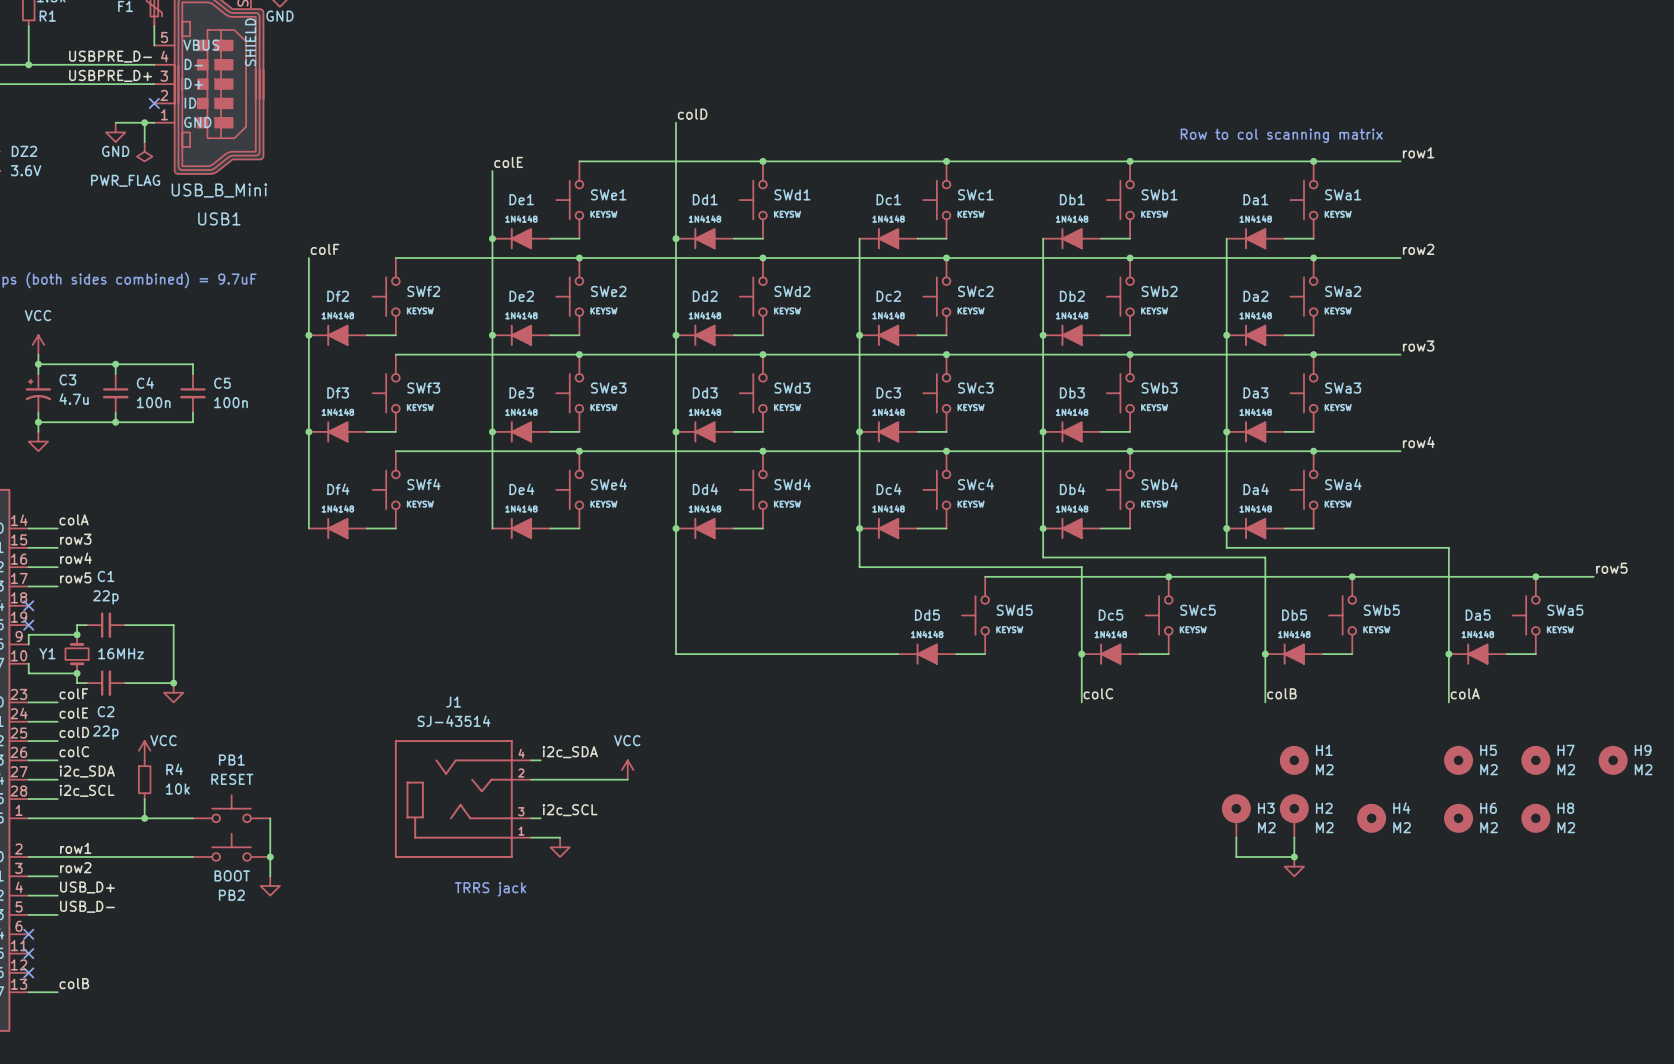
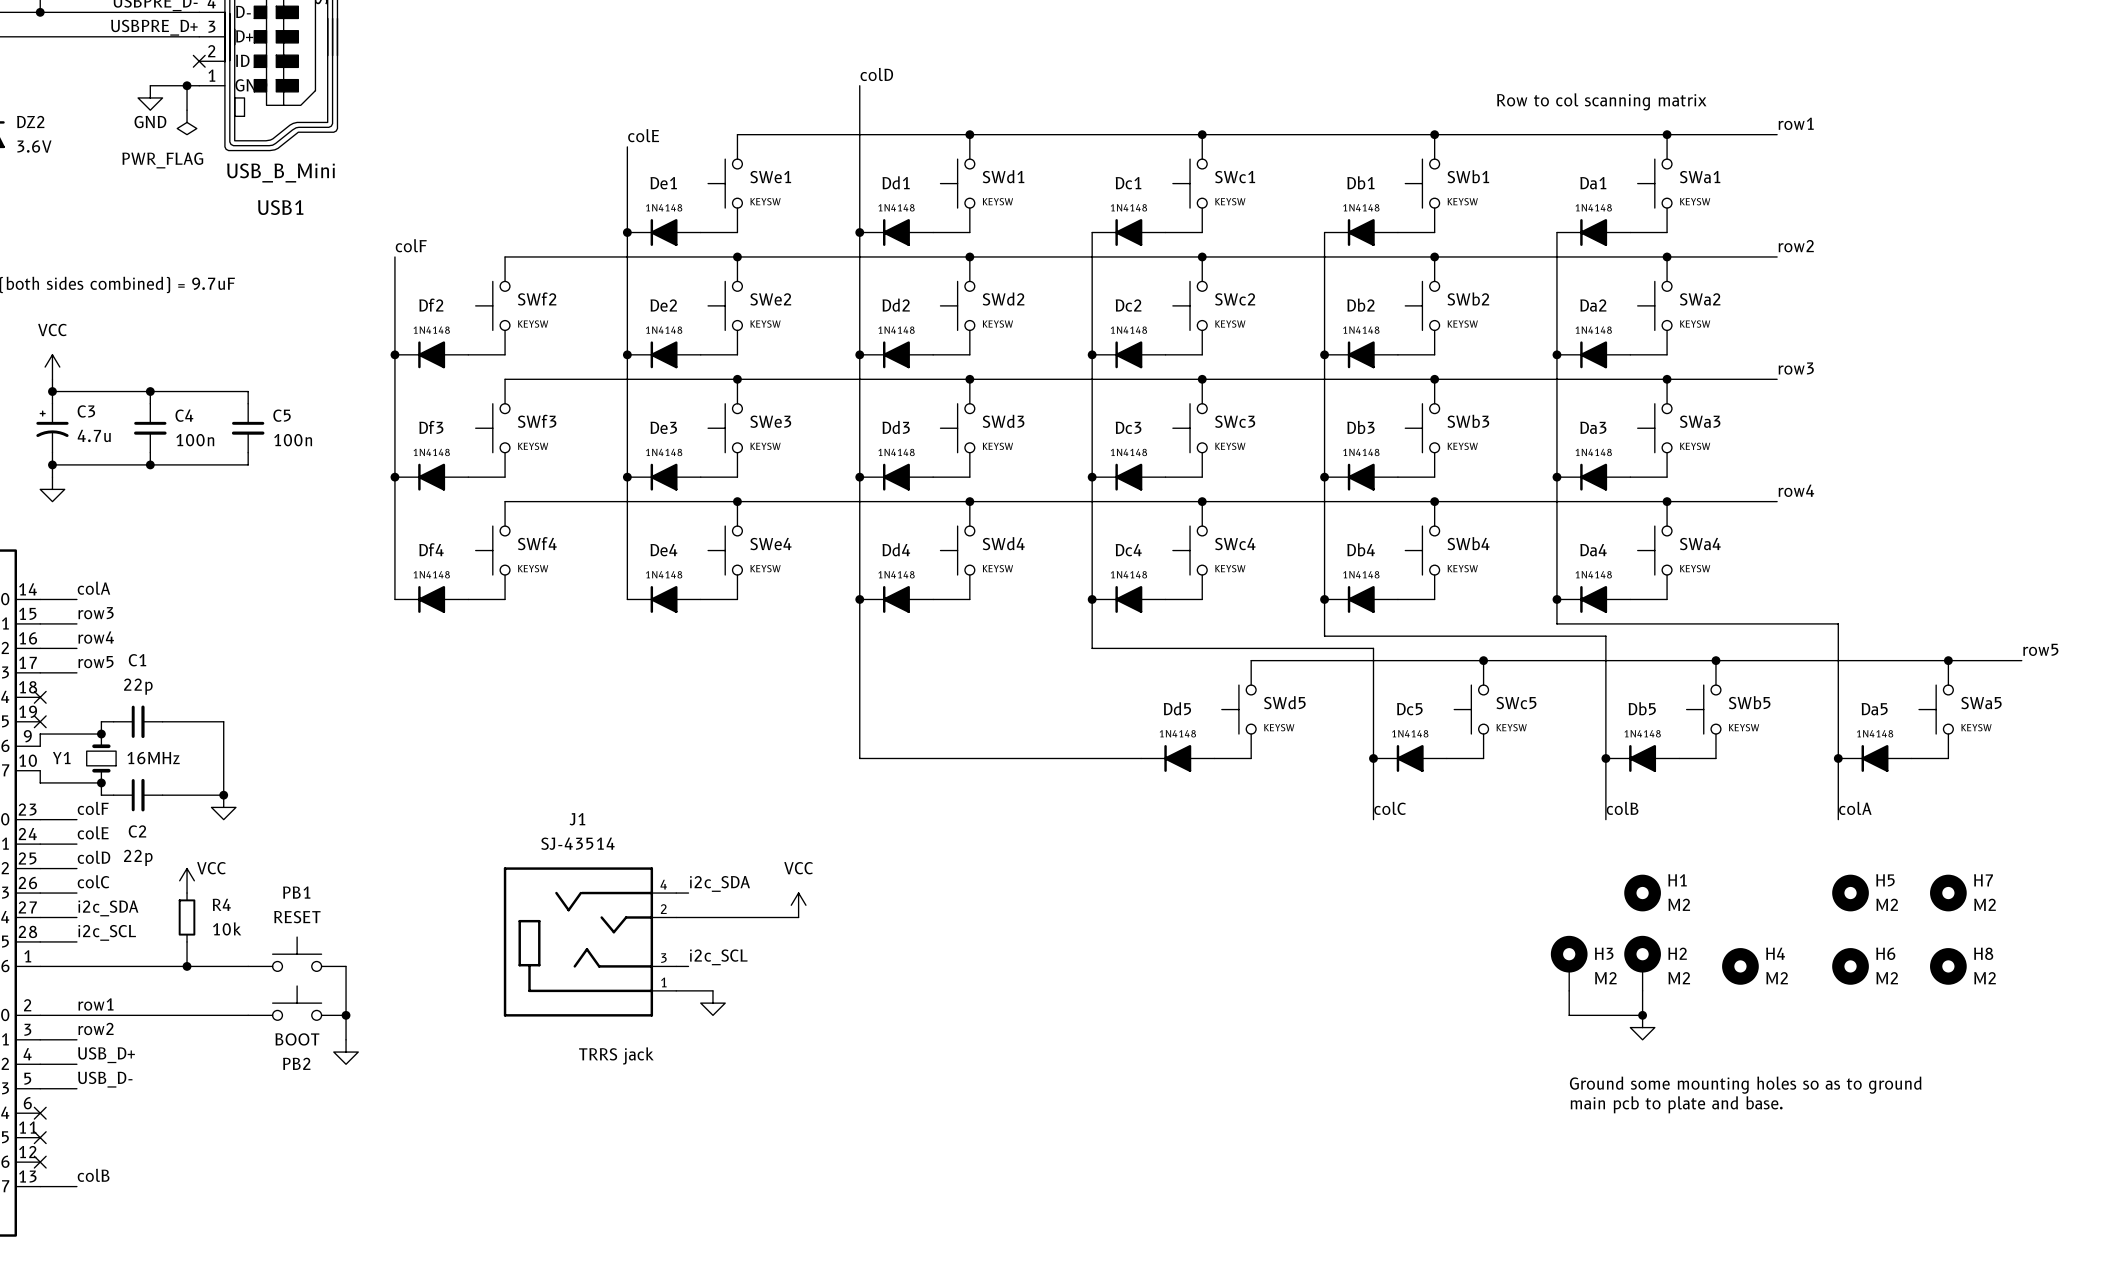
H9: M2 (1613, 760) -> none
text: none -> Ground some mounting holes so as to ground (1745, 1085)
text: none -> main pcb to plate and base. (1676, 1104)

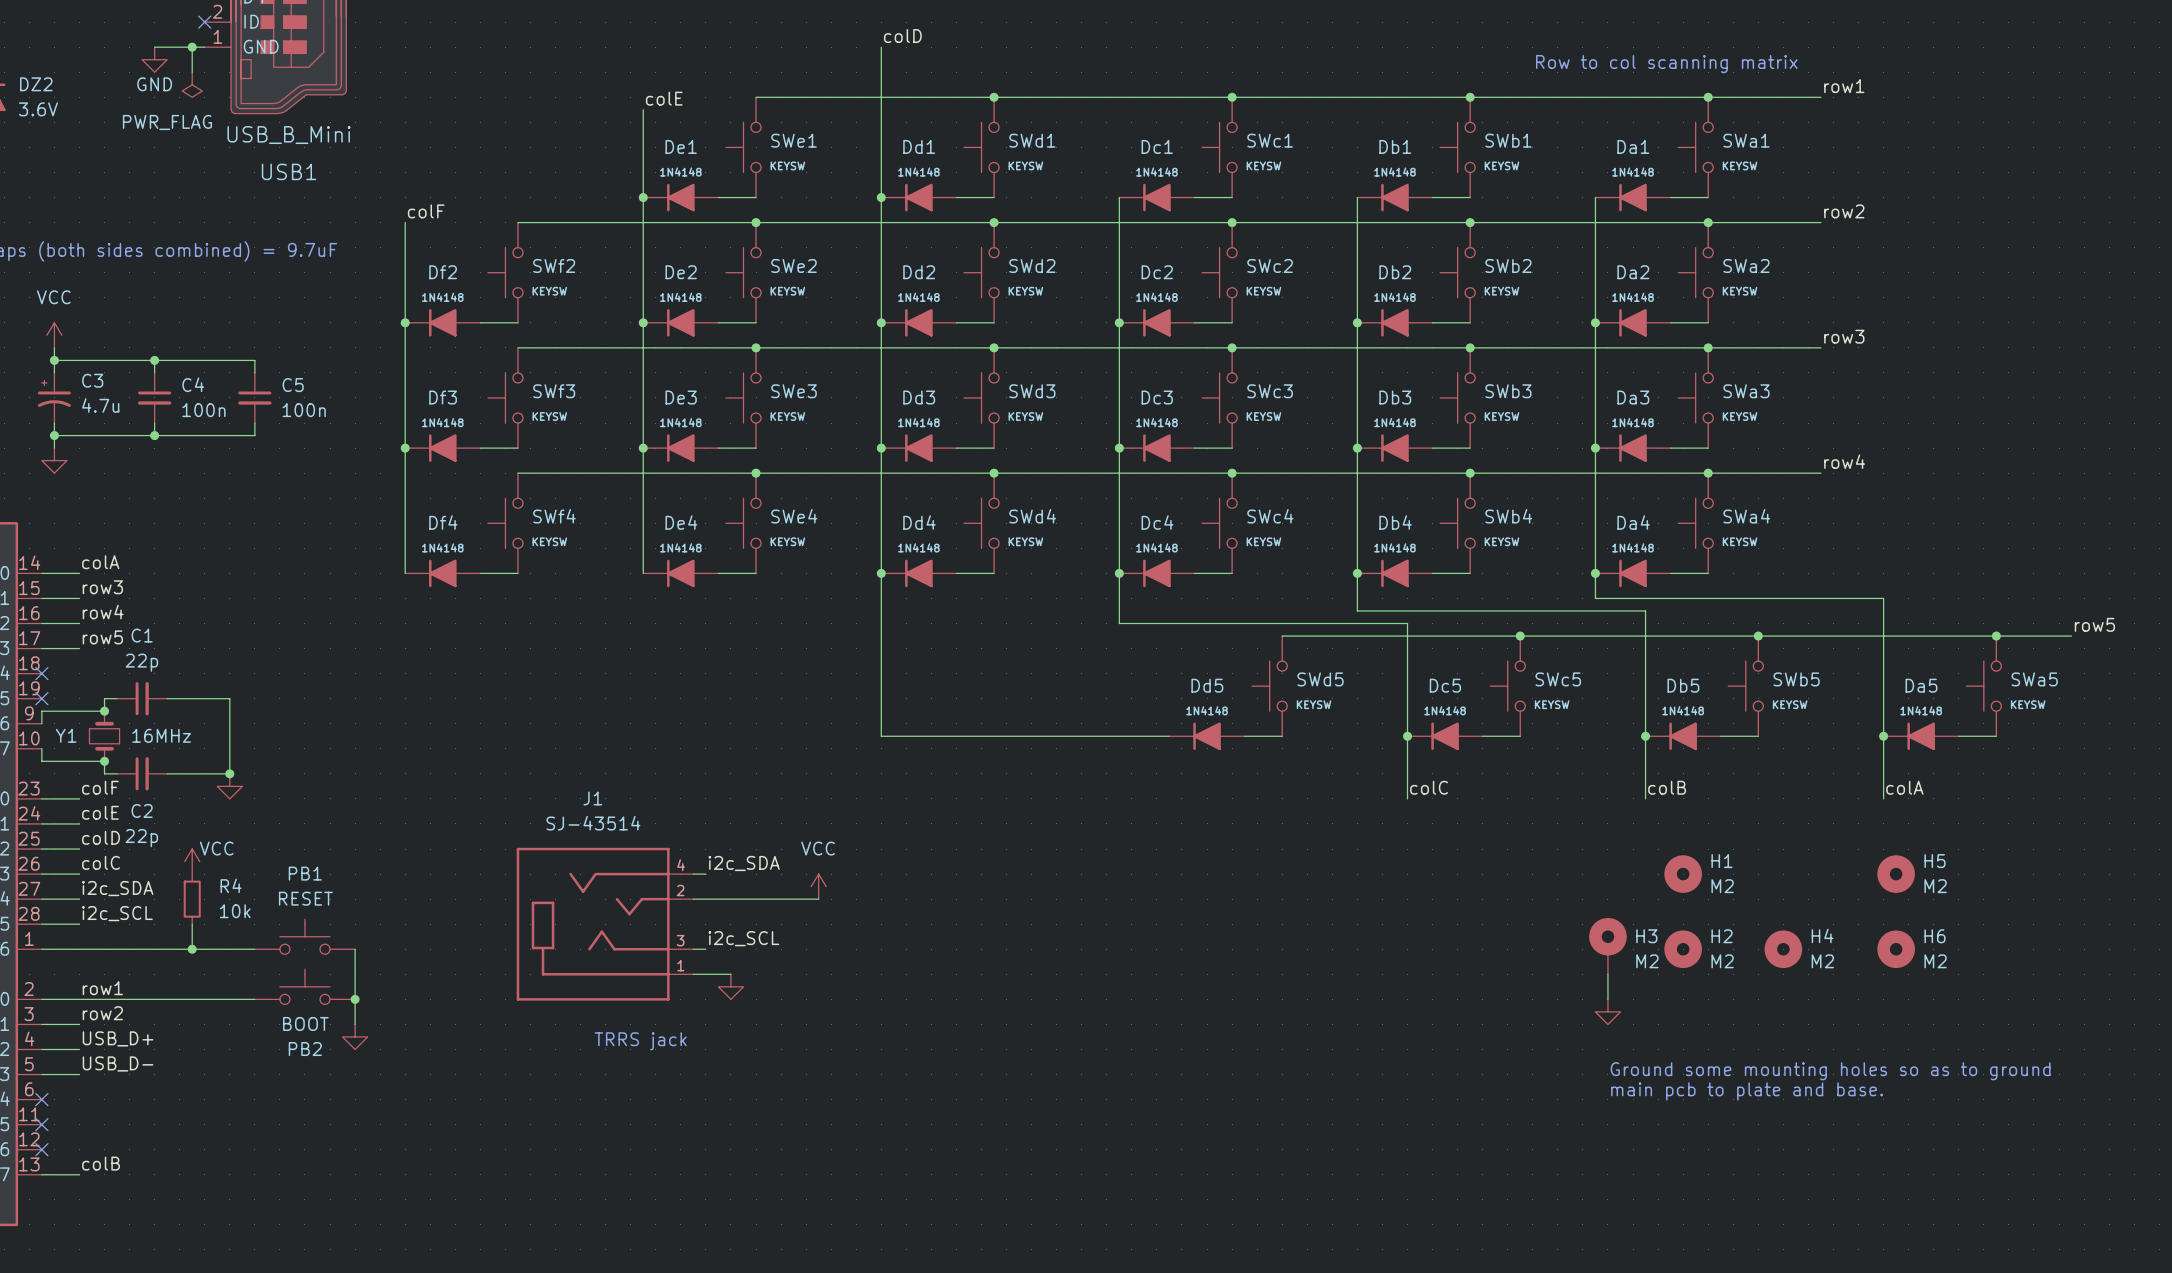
H7: M2 (1948, 893) -> none
H2 symbol: [1624, 935, 1661, 991] -> [1664, 930, 1702, 969]
H8: M2 (1948, 966) -> none
wire: (1642, 990) (1642, 1015) (1569, 1015) -> none
junction: (1642, 1015) -> none
power symbol position: (1642, 1027) -> (1607, 1011)

